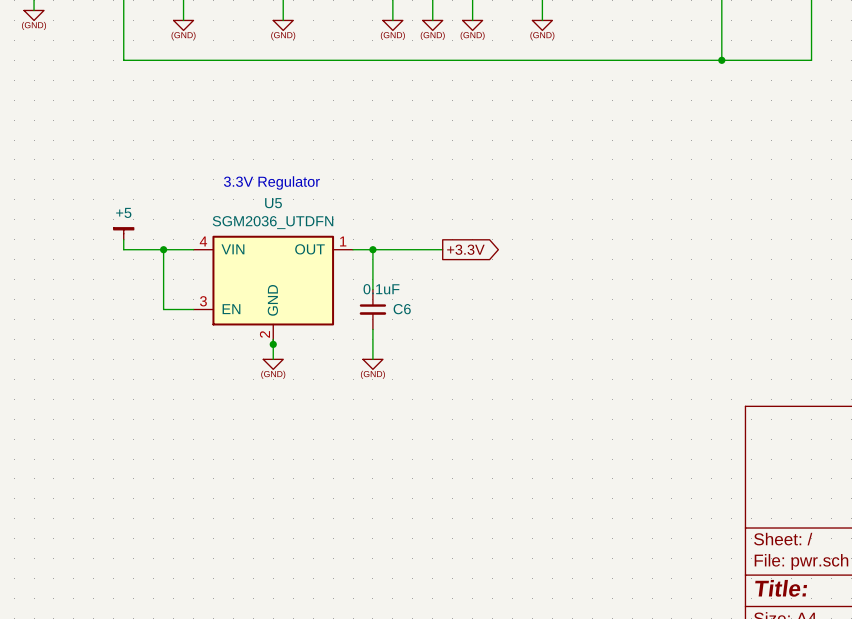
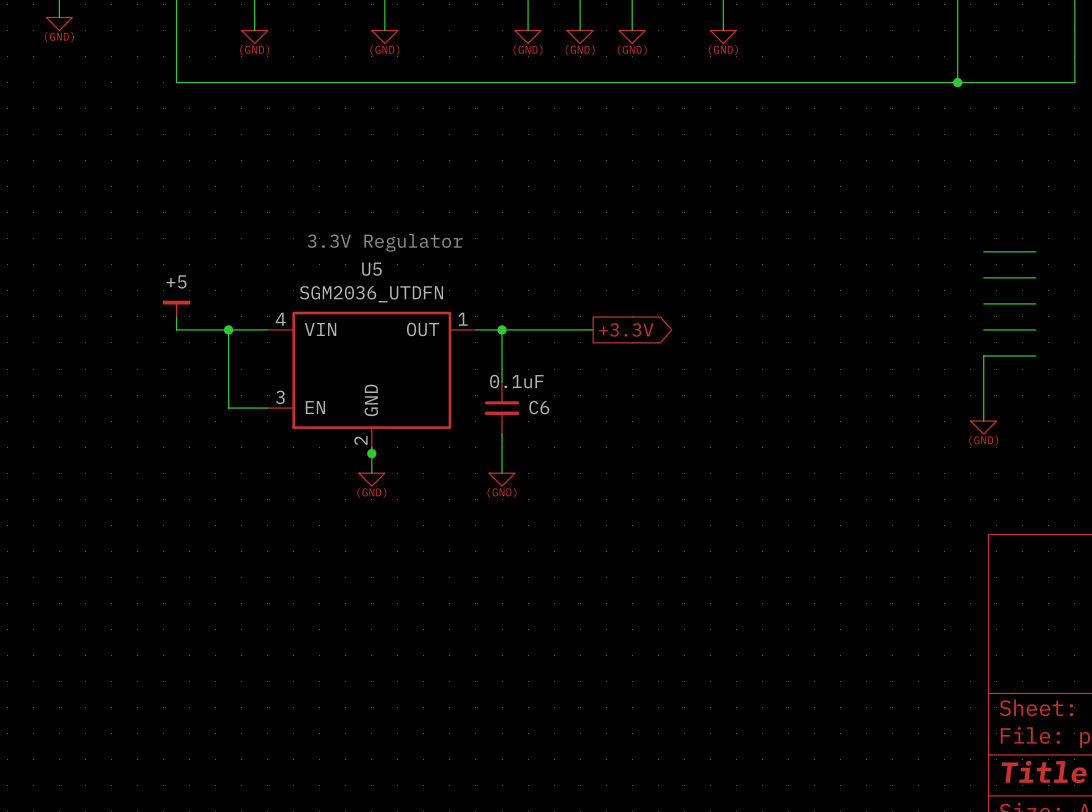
wire: none -> (983, 251) (1035, 251)
wire: none -> (983, 277) (1035, 277)
wire: none -> (983, 303) (1035, 303)
wire: none -> (983, 329) (1035, 329)
wire: none -> (1035, 355) (983, 355) (983, 421)
power symbol: none -> (983, 427)

